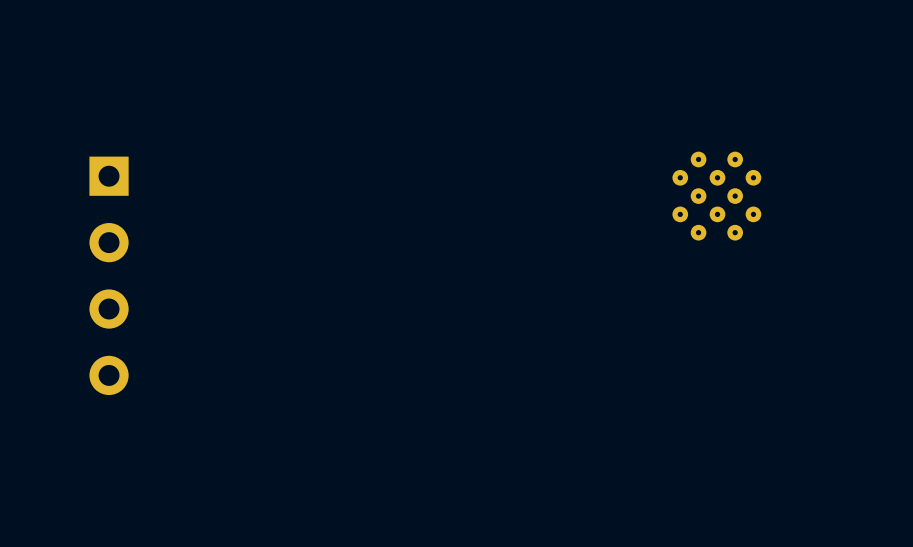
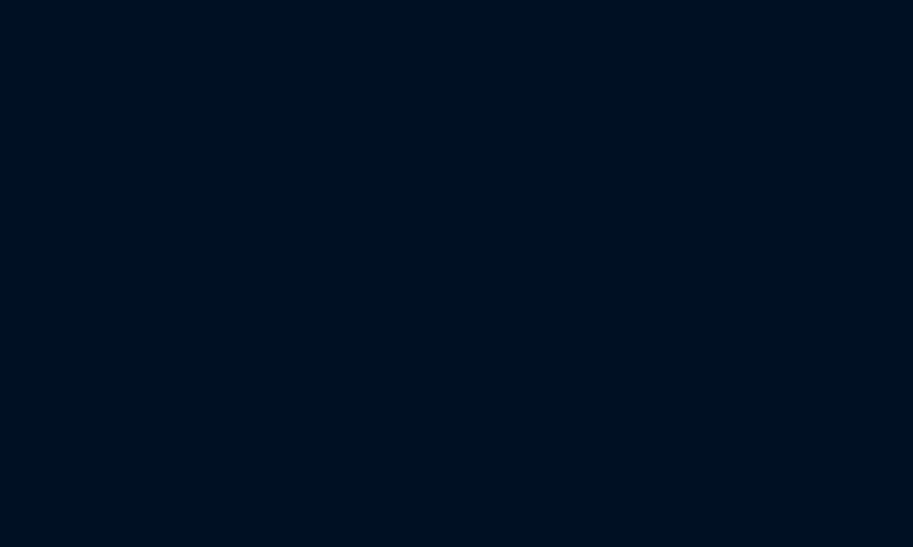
part: (716, 196) -> none
part: (109, 275) -> none

